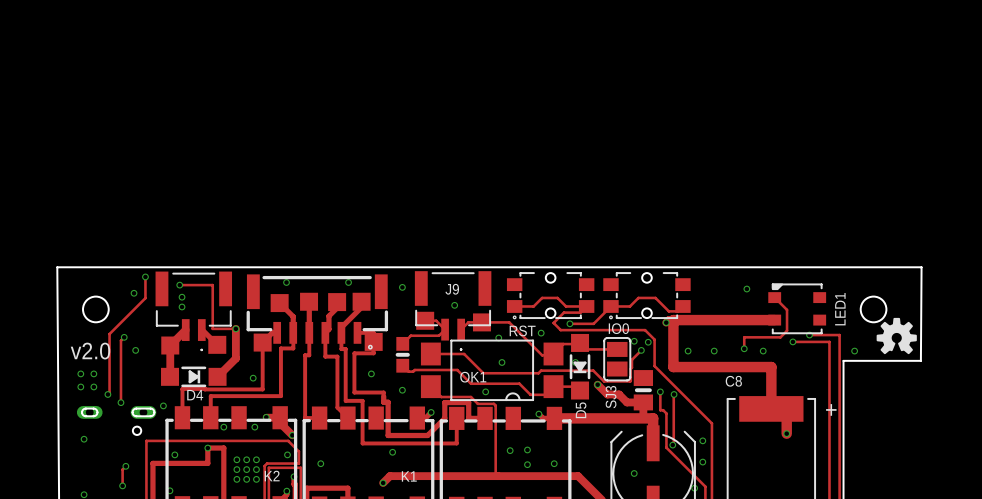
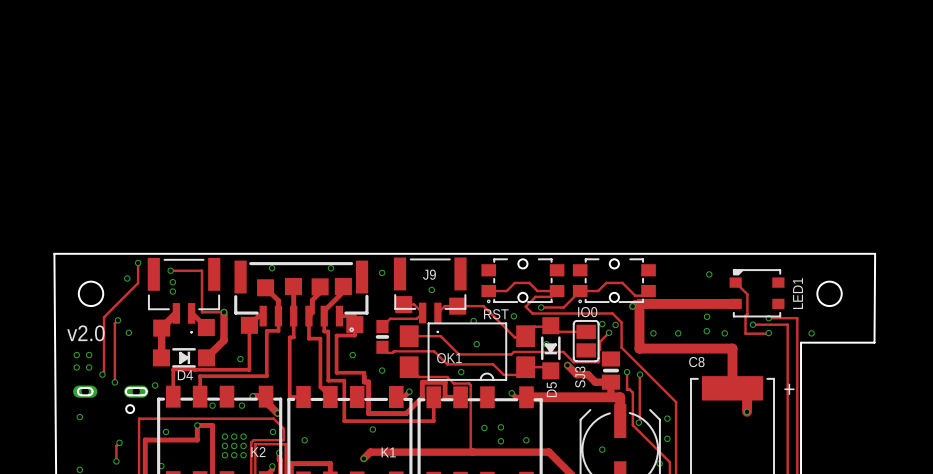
drawing: [876, 317, 917, 355] -> none
track: (785, 332) (780, 337) (744, 337) (744, 348) -> (745, 316) (745, 333) (768, 333)
via: none -> (707, 316)
via: none -> (768, 333)

